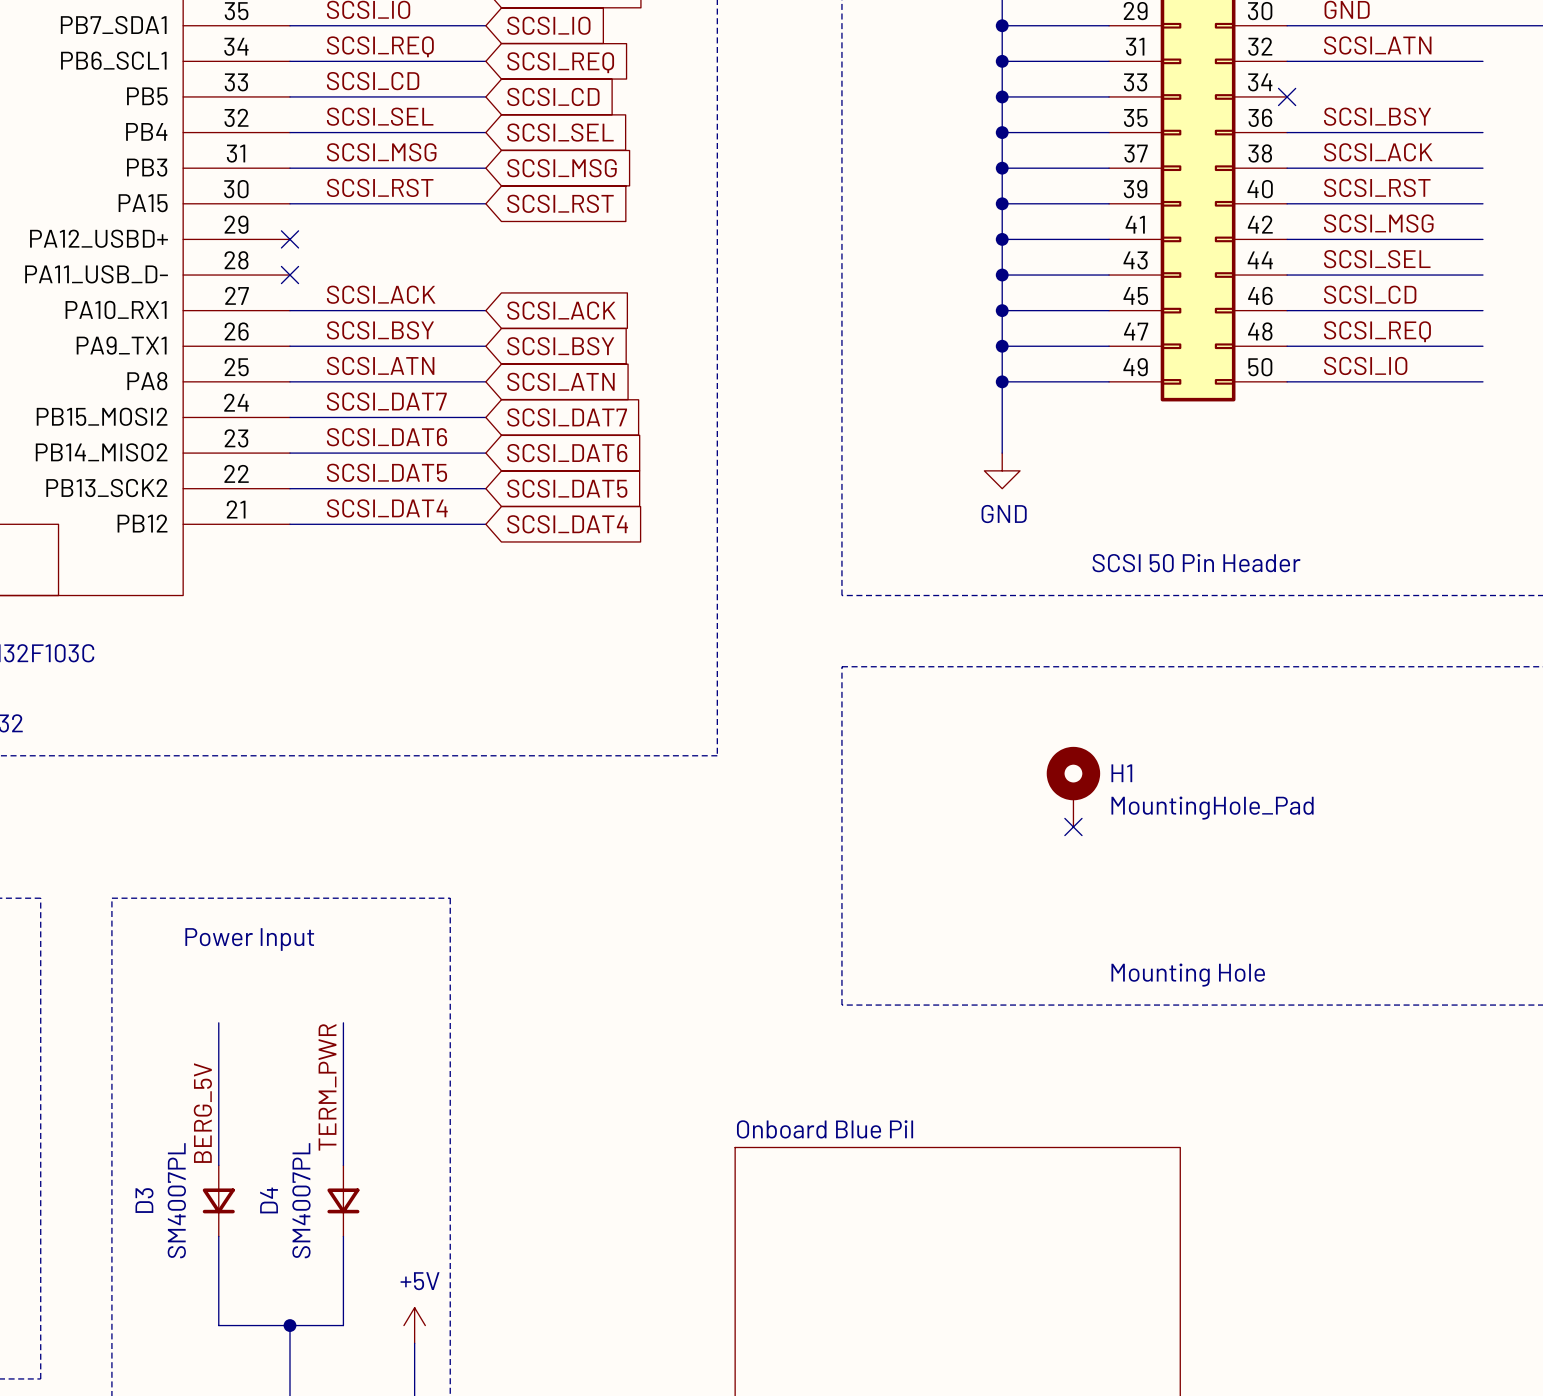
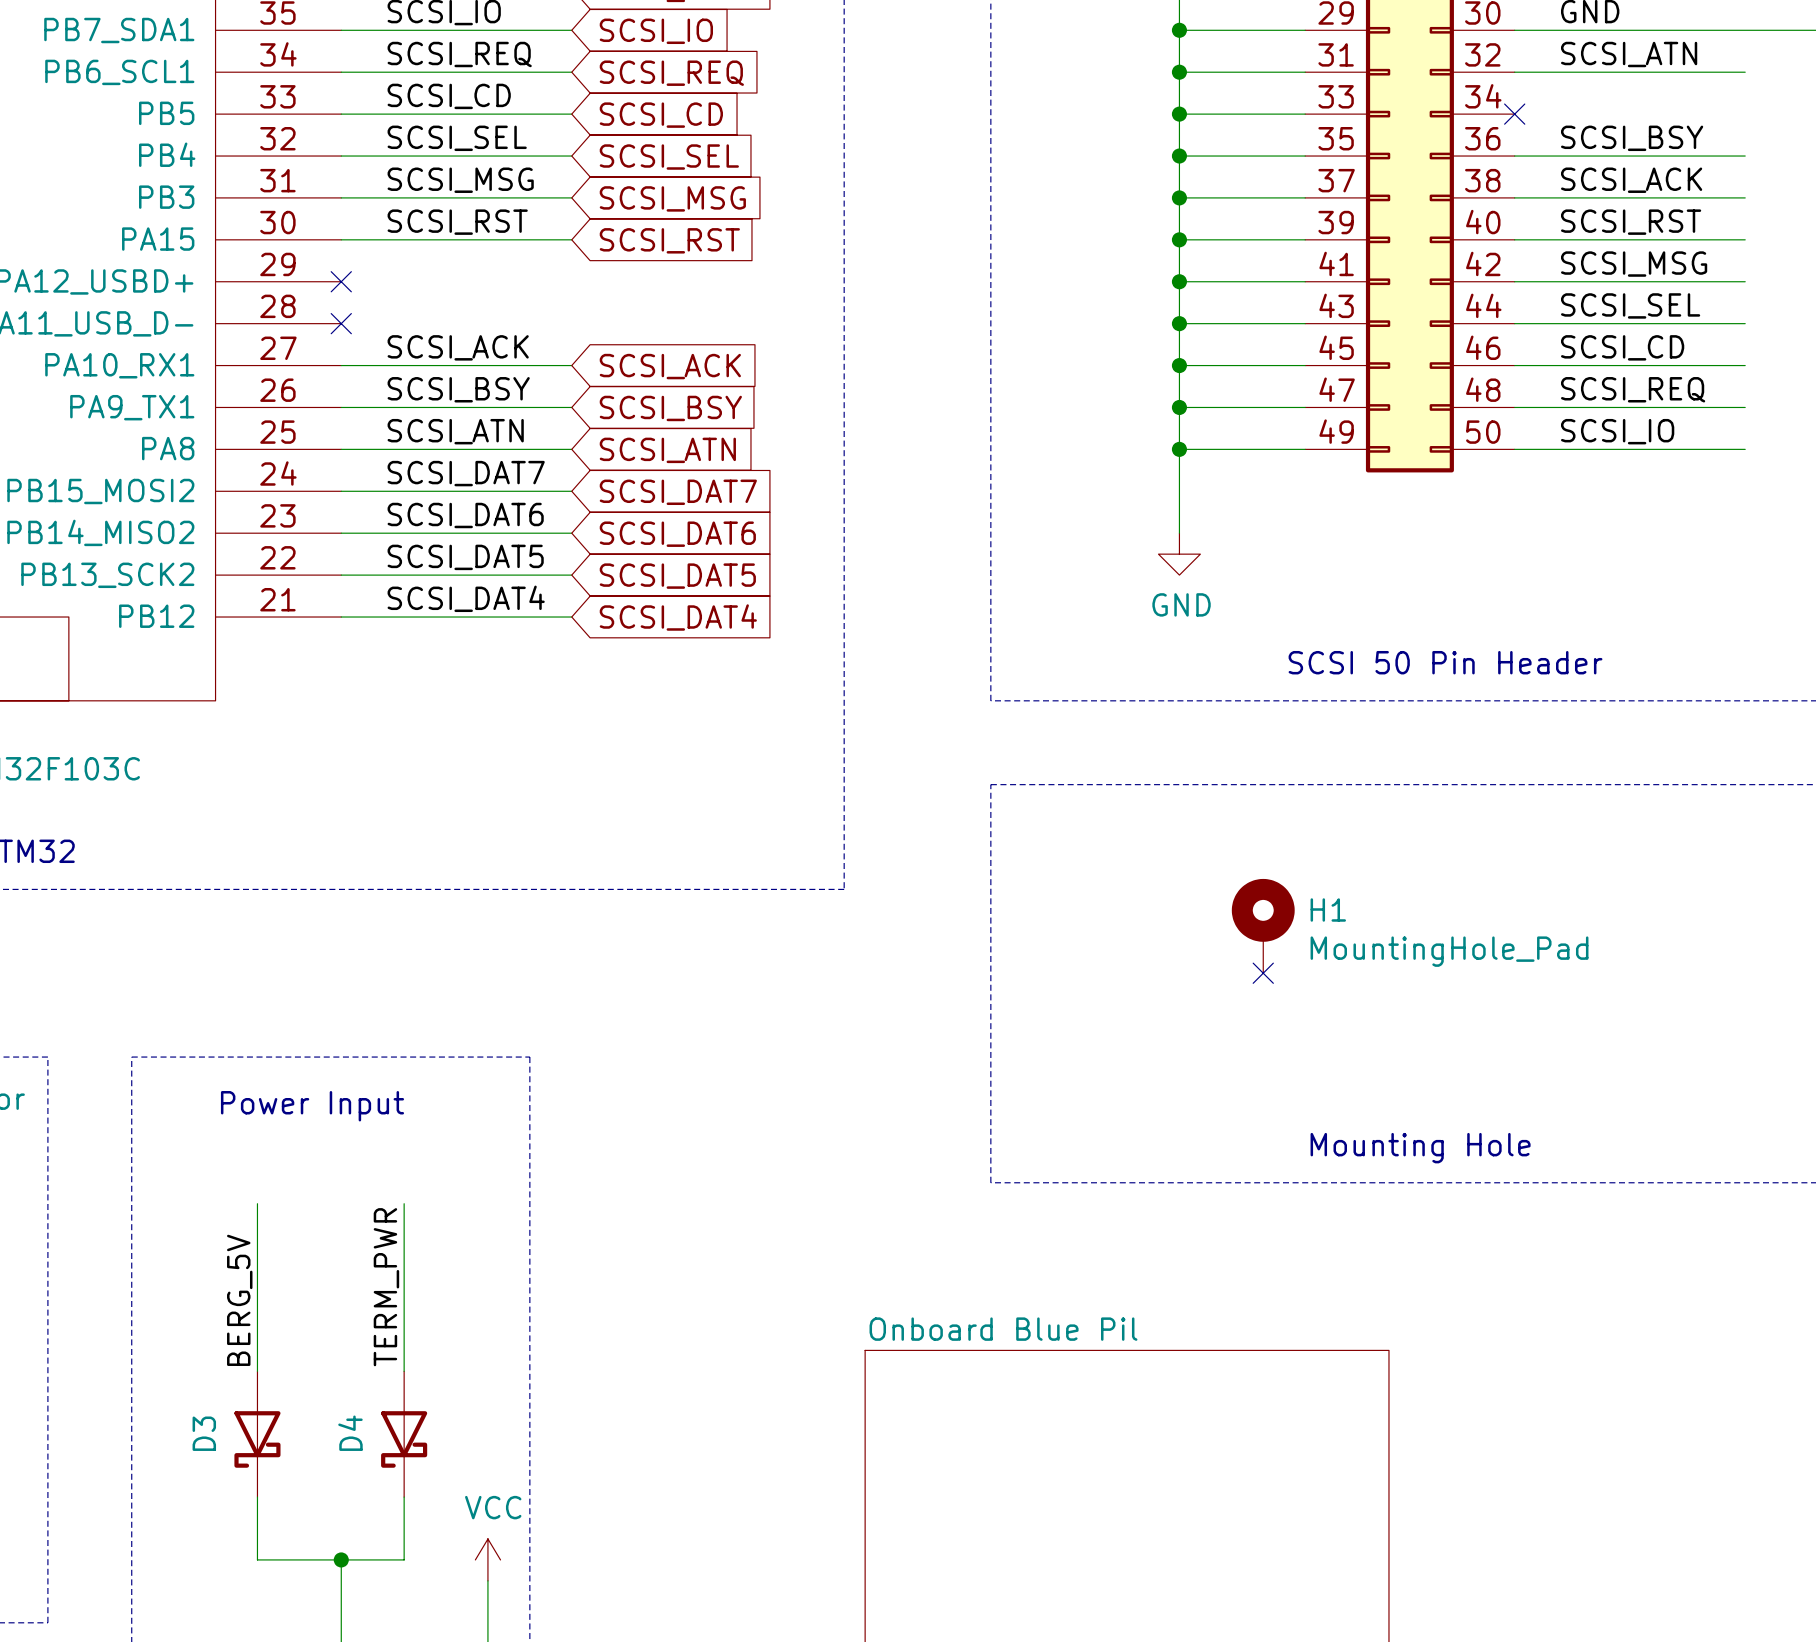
D3 symbol: [202, 1165, 235, 1237] -> [234, 1371, 281, 1498]
D4 symbol: [327, 1165, 360, 1237] -> [381, 1371, 428, 1498]
D3 name position: D3 (144, 1200) -> D3 (204, 1433)
D3 value: SM4007PL (176, 1200) -> none
D4 name position: D4 (269, 1200) -> D4 (350, 1433)
D4 value: SM4007PL (301, 1200) -> none
power symbol: +5V (414, 1325) -> VCC (487, 1559)

